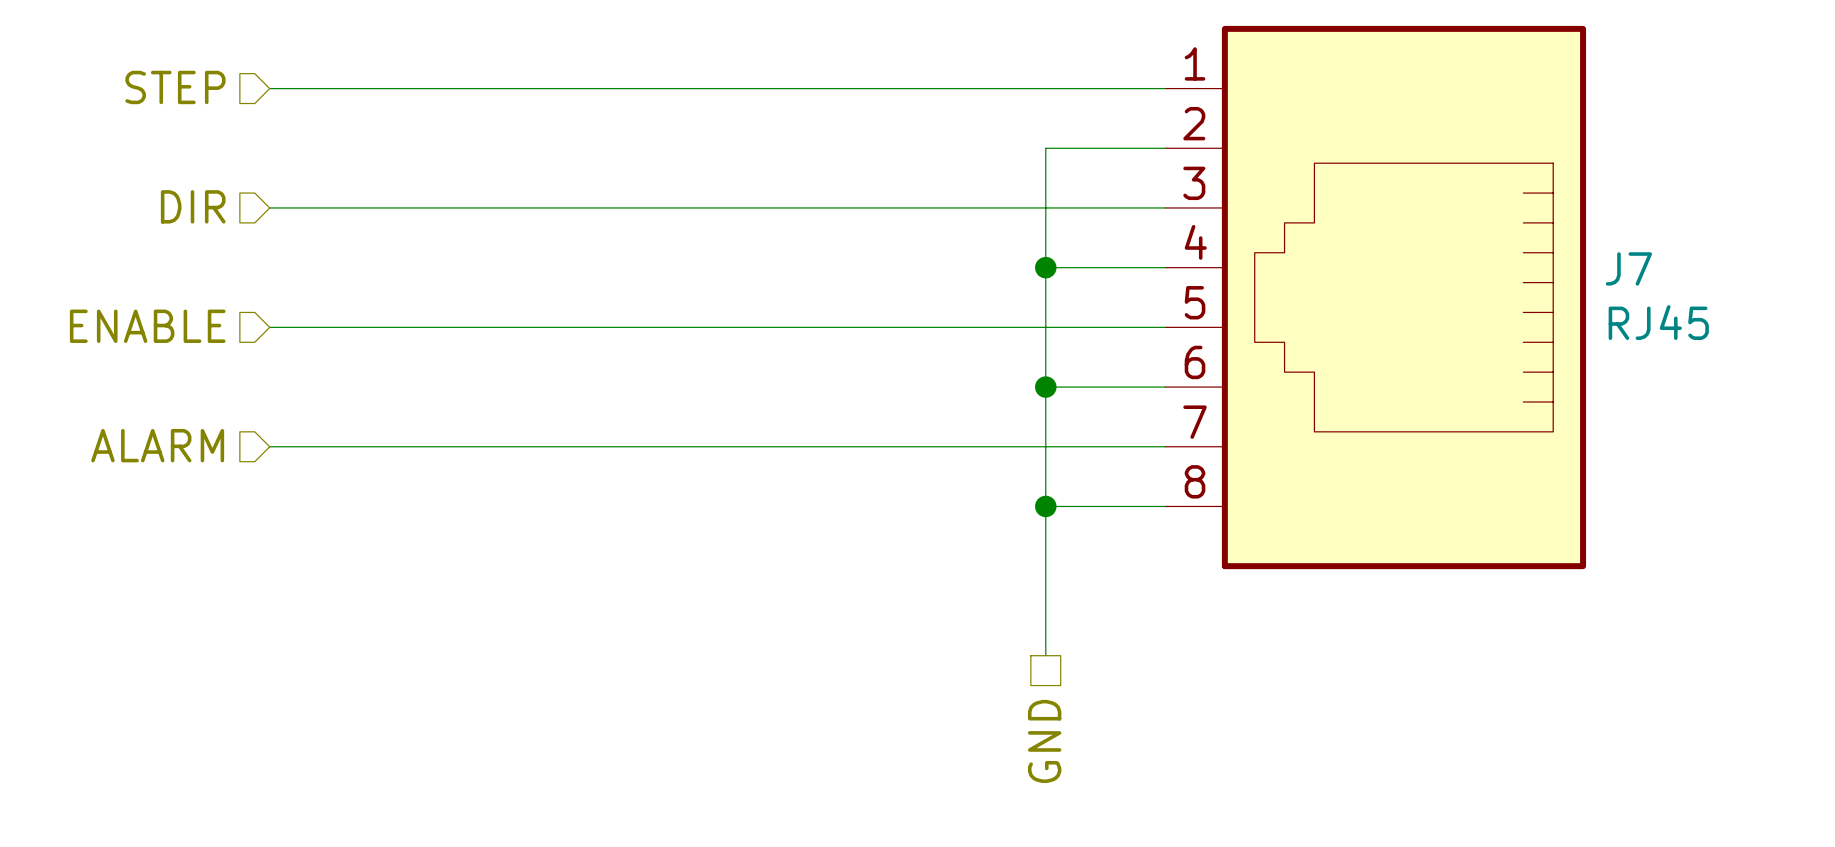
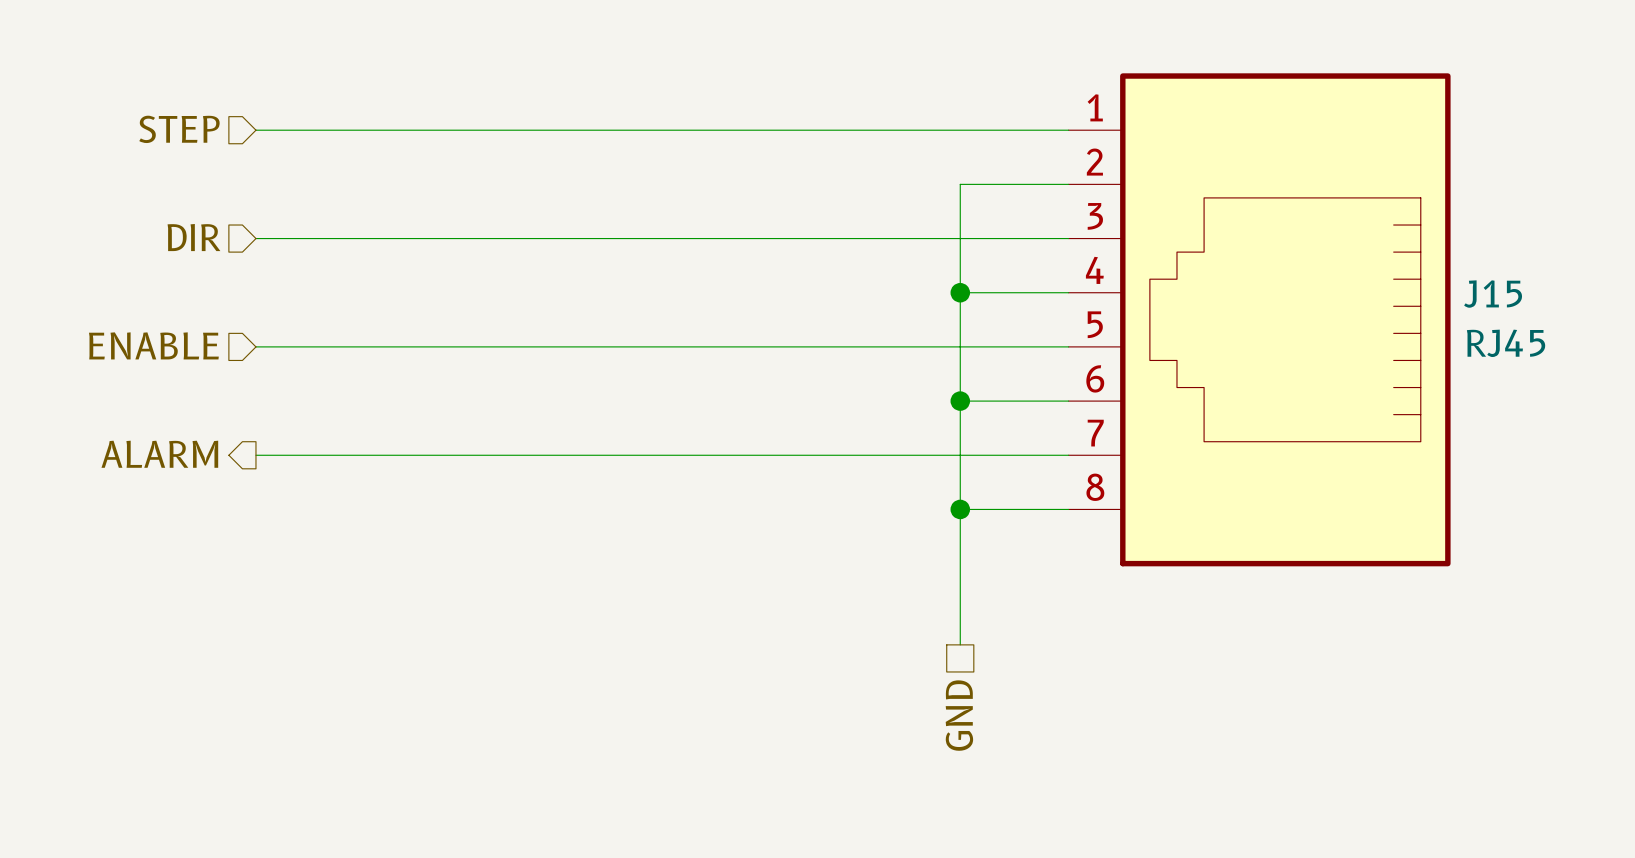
J7 name: J7 (1628, 268) -> J15 (1493, 294)
hierarchical label shape: input (157, 445) -> output (159, 454)

